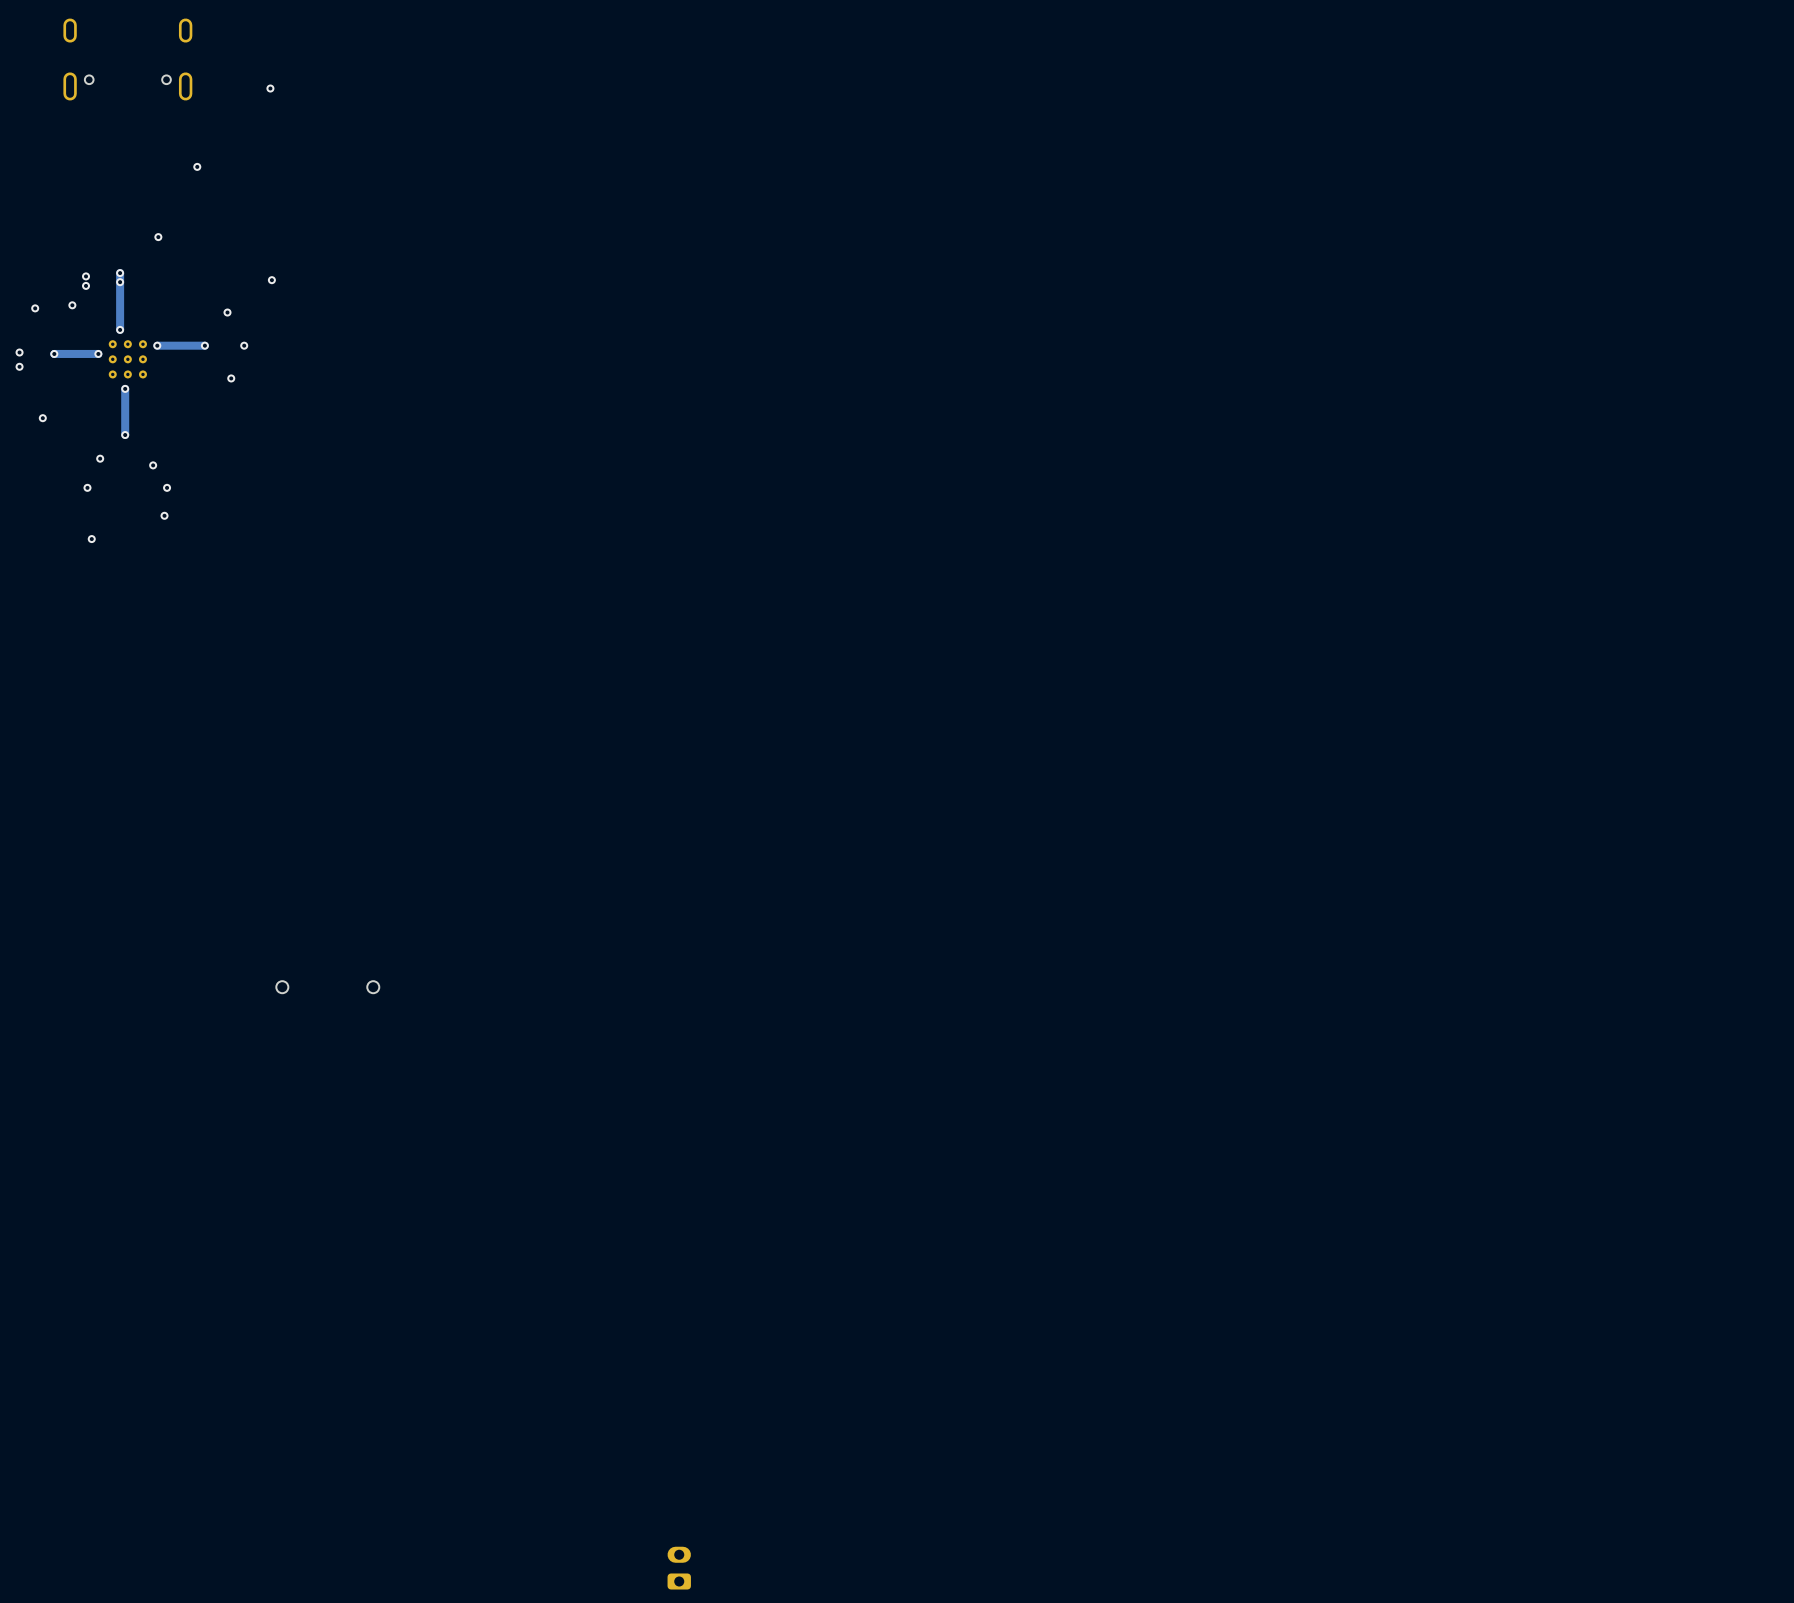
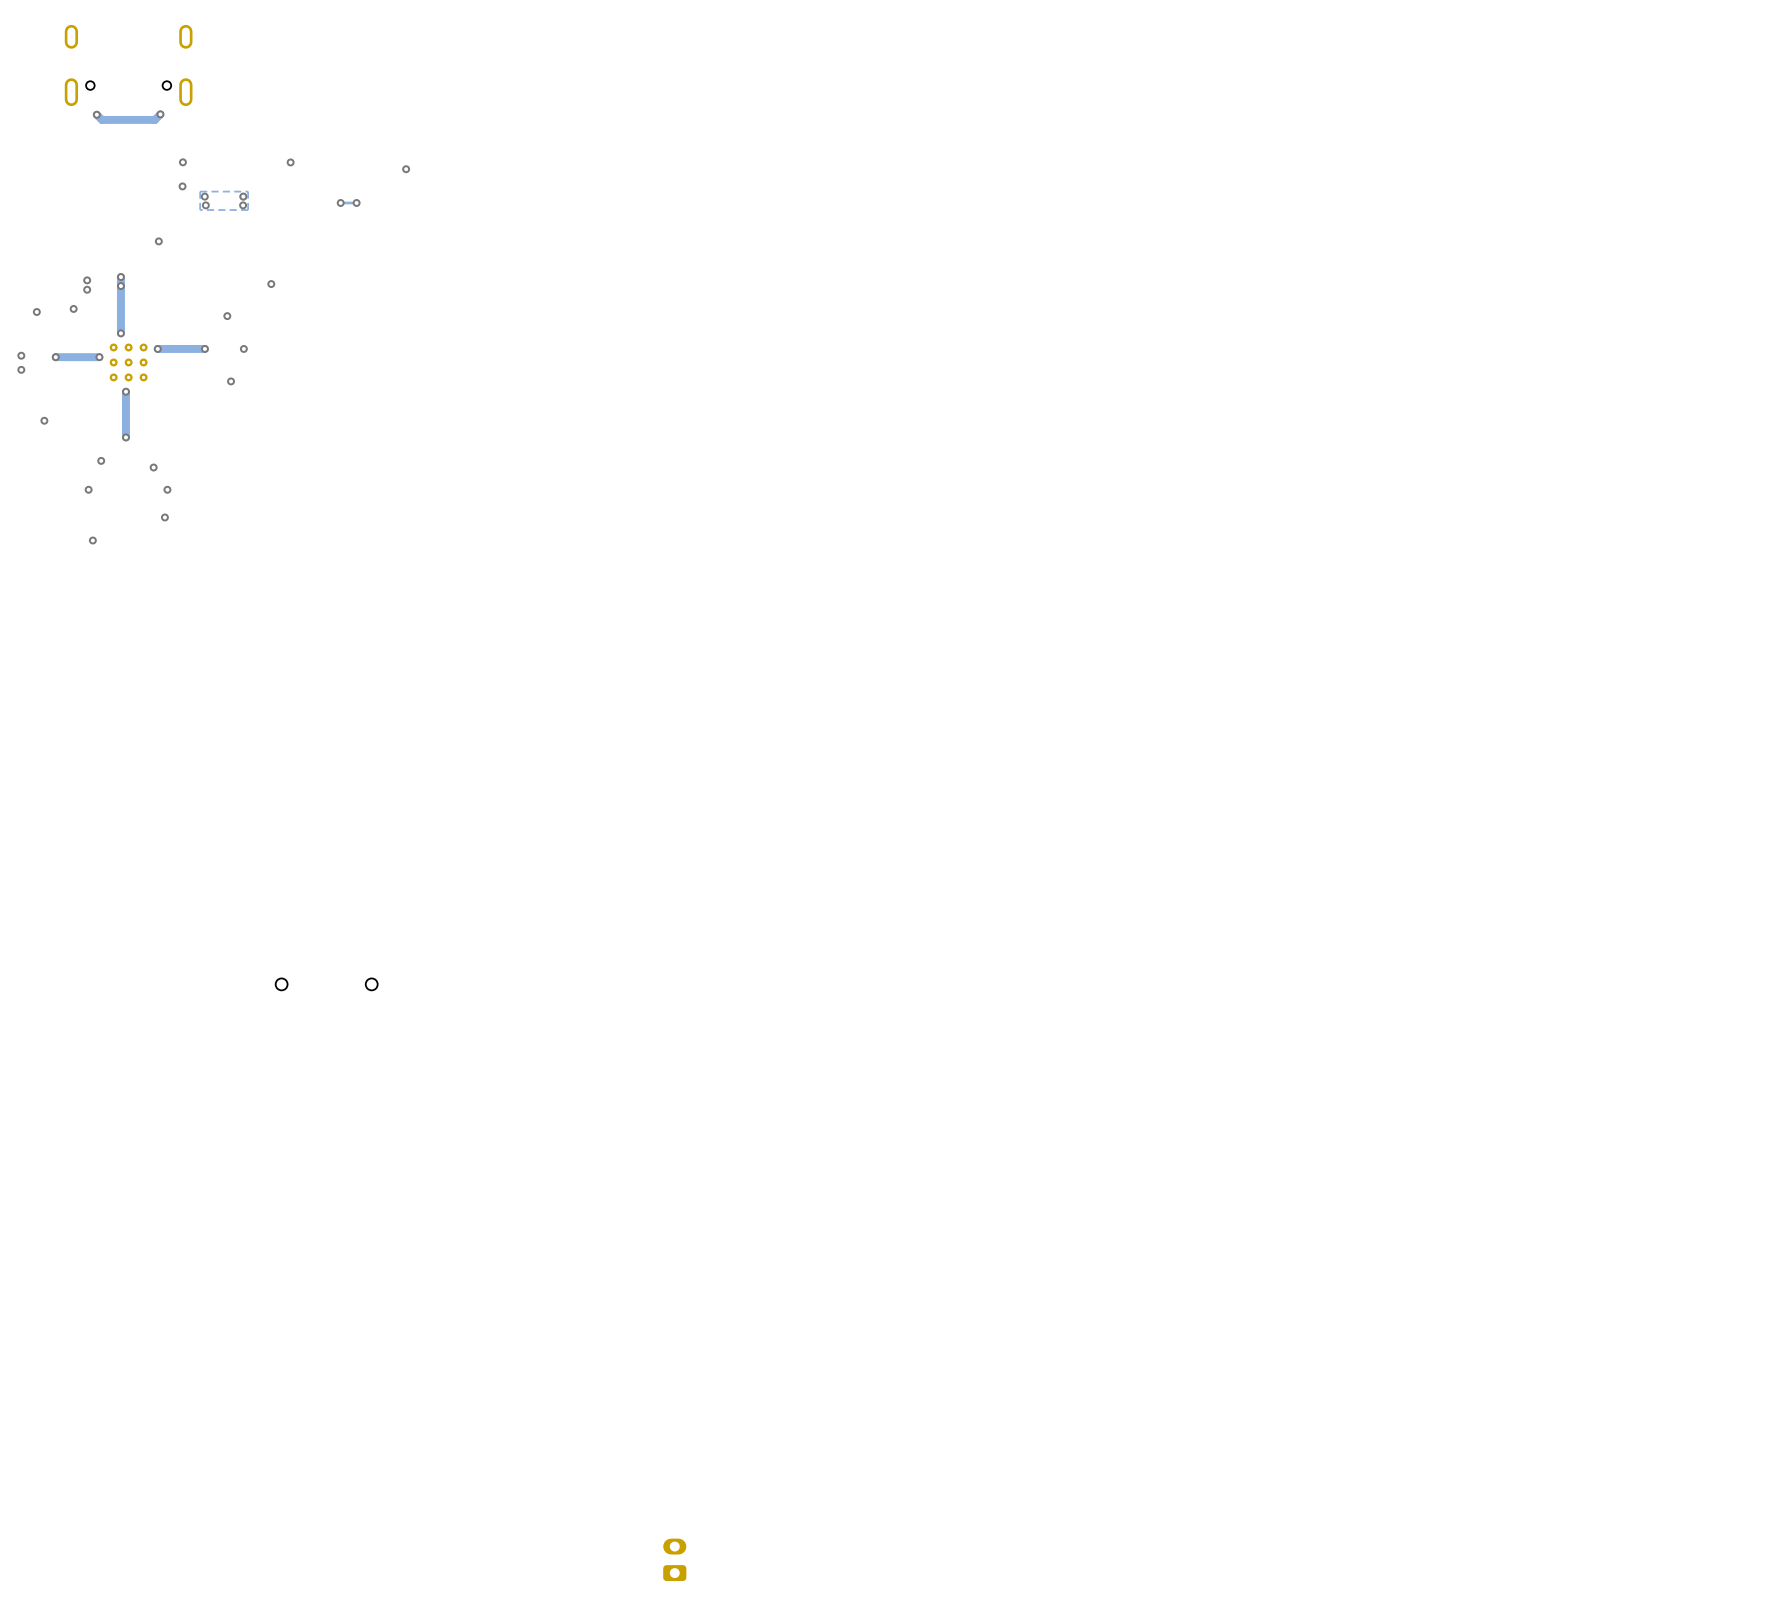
via: (270, 88) -> none
track: none -> (160, 114) (154, 119) (102, 119) (96, 114)
via: none -> (160, 114)
via: none -> (96, 114)
via: none -> (182, 162)
via: none -> (290, 162)
via: none -> (406, 169)
via: (197, 166) -> none
via: none -> (182, 186)
zone outline: none -> (248, 191) (248, 210) (200, 210) (200, 191) (248, 191)
via: none -> (204, 196)
via: none -> (243, 196)
via: none -> (340, 202)
track: none -> (356, 202) (340, 202)
via: none -> (356, 202)
via: none -> (205, 205)
via: none -> (243, 205)

